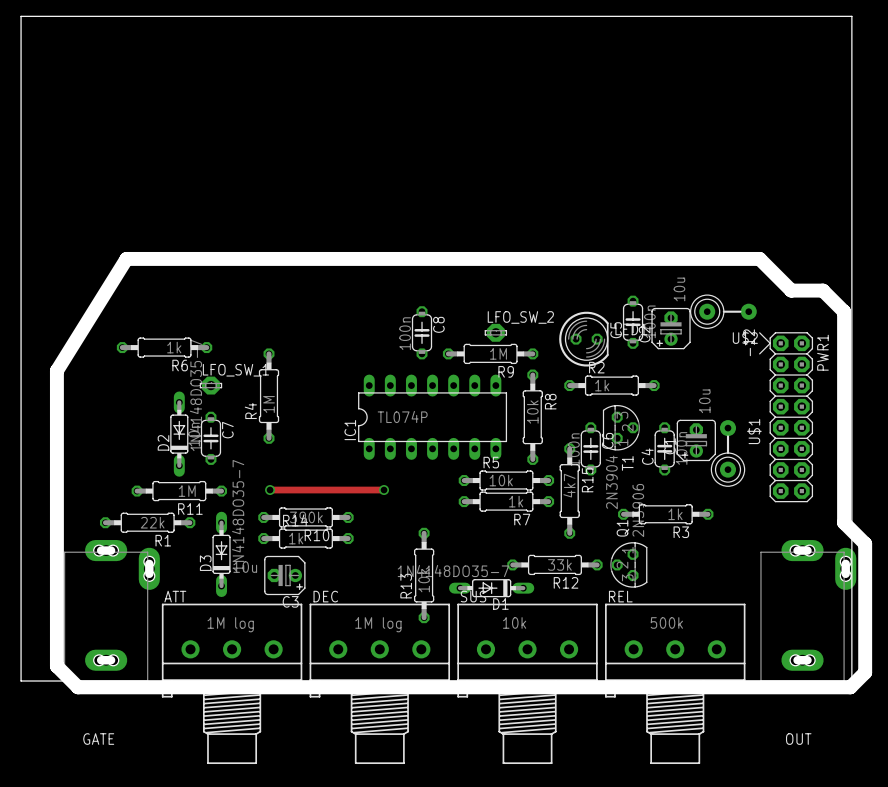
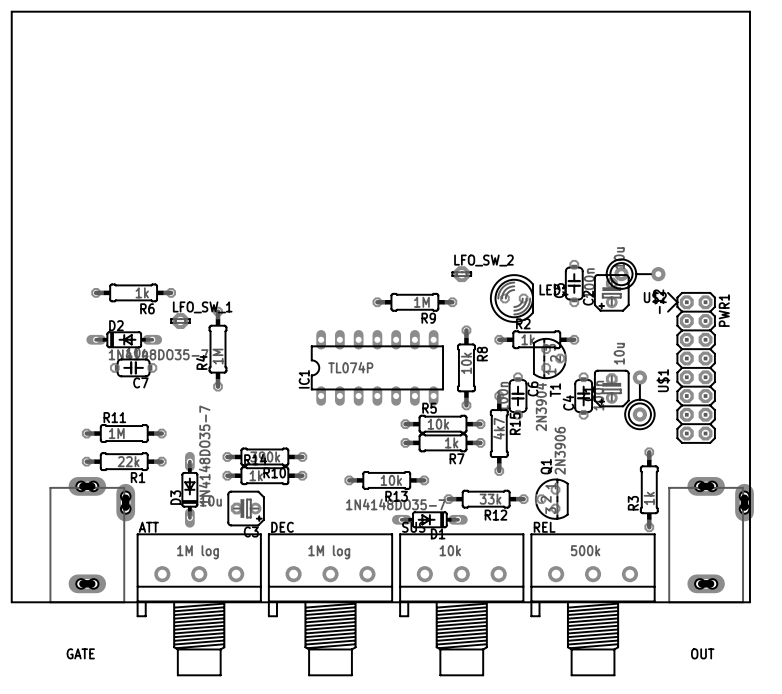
board edge: (126, 258) (759, 258) (791, 290) (822, 290) (844, 311) (844, 522) (865, 543) (865, 672) (850, 687) (78, 687) (56, 666) (56, 370) (126, 258) -> none
C5 position: (633, 322) -> (574, 283)
C2 position: (671, 328) -> (611, 292)
C8: 100n (422, 332) -> none
LFO_SW_2 position: (495, 332) -> (461, 274)
R6 position: (164, 347) -> (133, 292)
R9 position: (490, 353) -> (414, 302)
LFO_SW_1 position: (210, 385) -> (180, 321)
R4 position: (269, 396) -> (218, 349)
T1 position: (621, 427) -> (549, 358)
D2 rotation: 0° (179, 434) -> 90° clockwise (124, 339)
D2 position: (179, 434) -> (124, 339)
C7 rotation: 0° (210, 438) -> 90° clockwise (133, 367)
C7 position: (210, 438) -> (133, 367)
track: (270, 490) (384, 490) -> none
via: (270, 490) -> none
via: (384, 490) -> none
R11 position: (179, 491) -> (124, 433)
R11 value position: 1M (187, 491) -> 1M (116, 433)
R11 name position: R11 (190, 509) -> R11 (114, 417)
R3 rotation: 0° (665, 514) -> 90° clockwise (649, 489)
R3 position: (665, 514) -> (649, 489)
R13 rotation: 0° (424, 575) -> 90° clockwise (386, 480)
R13 name position: R13 (406, 586) -> R13 (396, 496)

